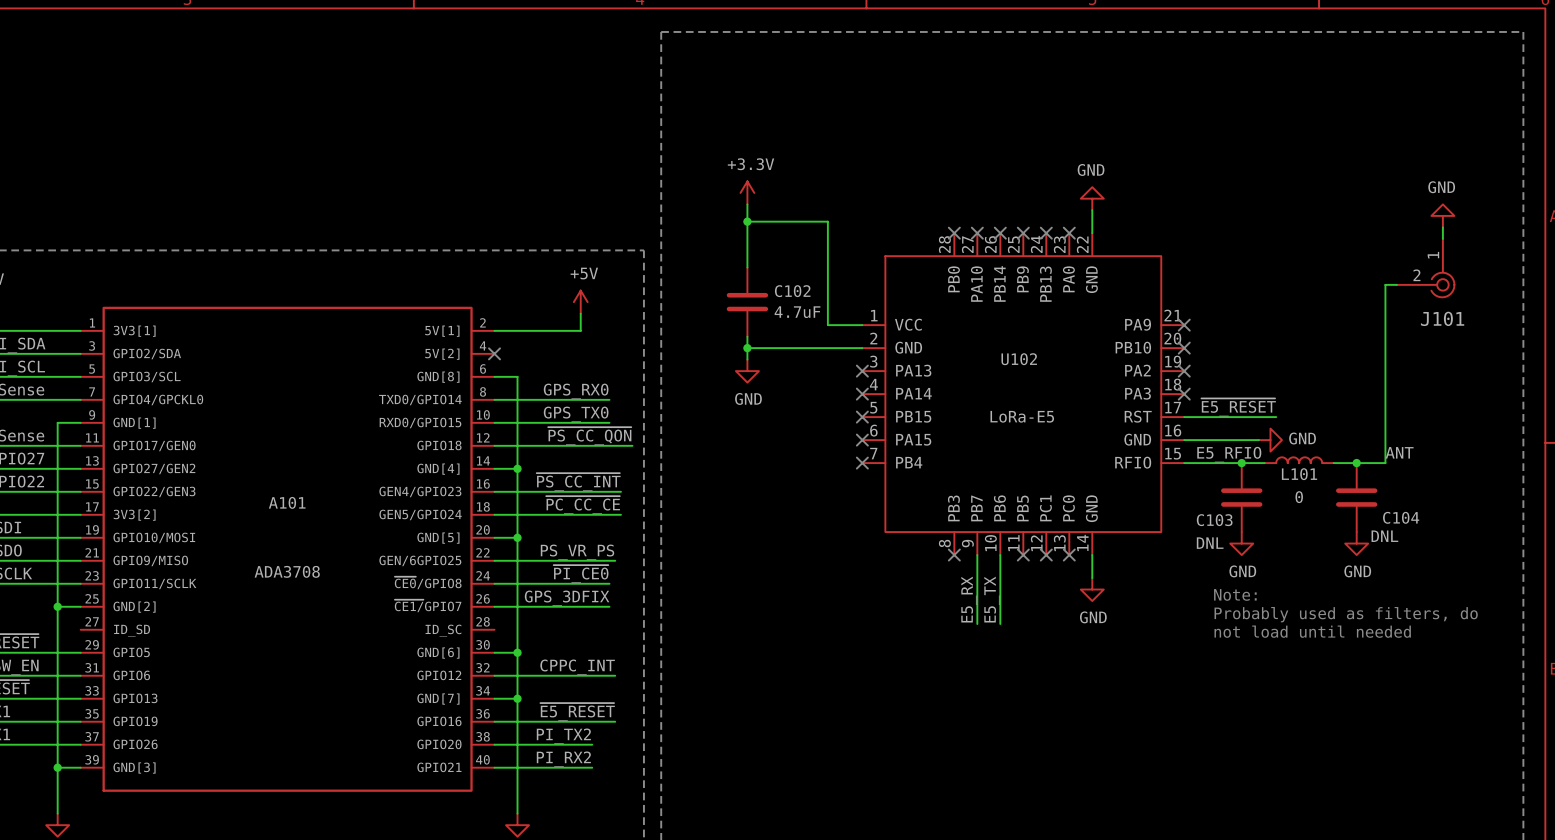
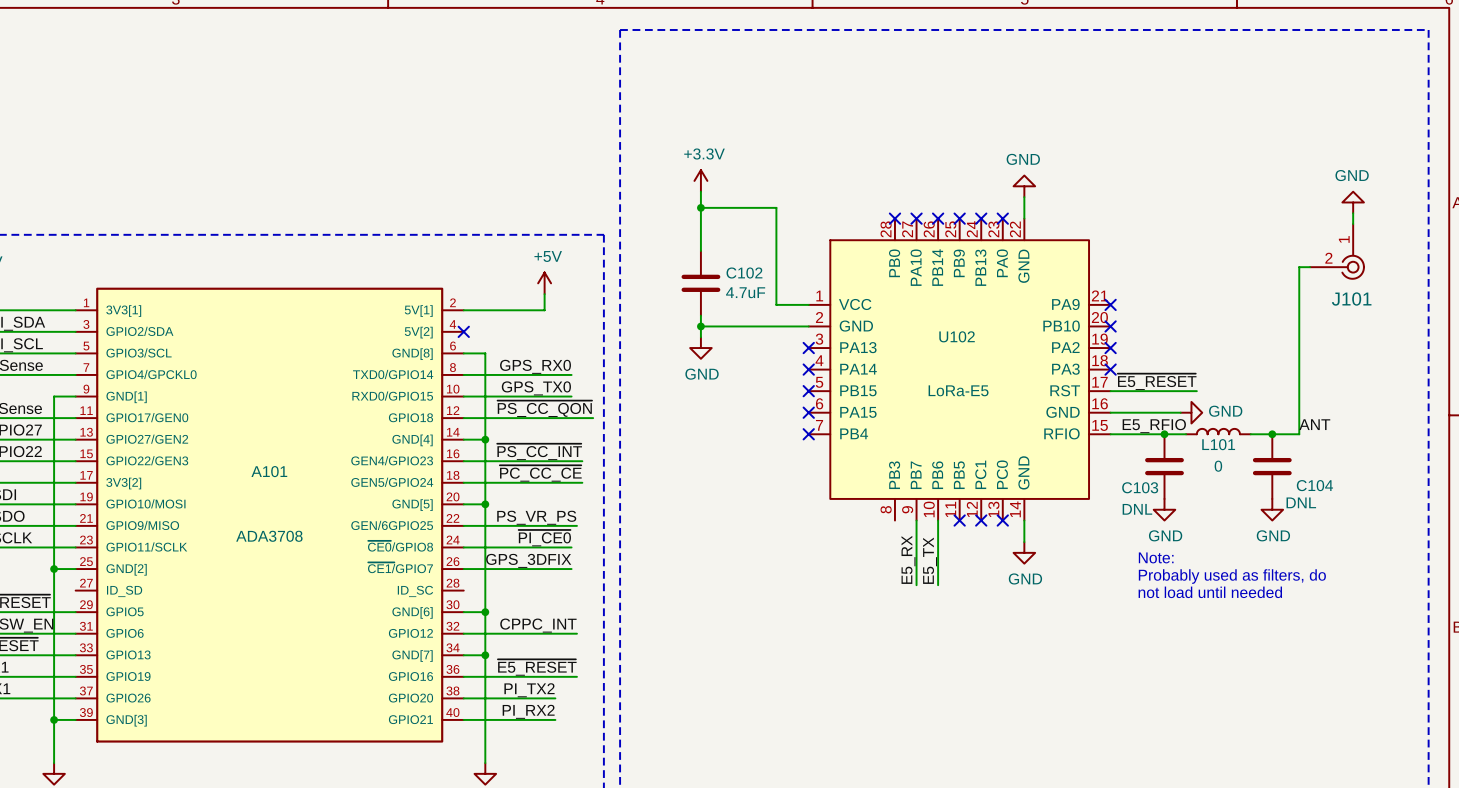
no-connect mark: (954, 555) -> none

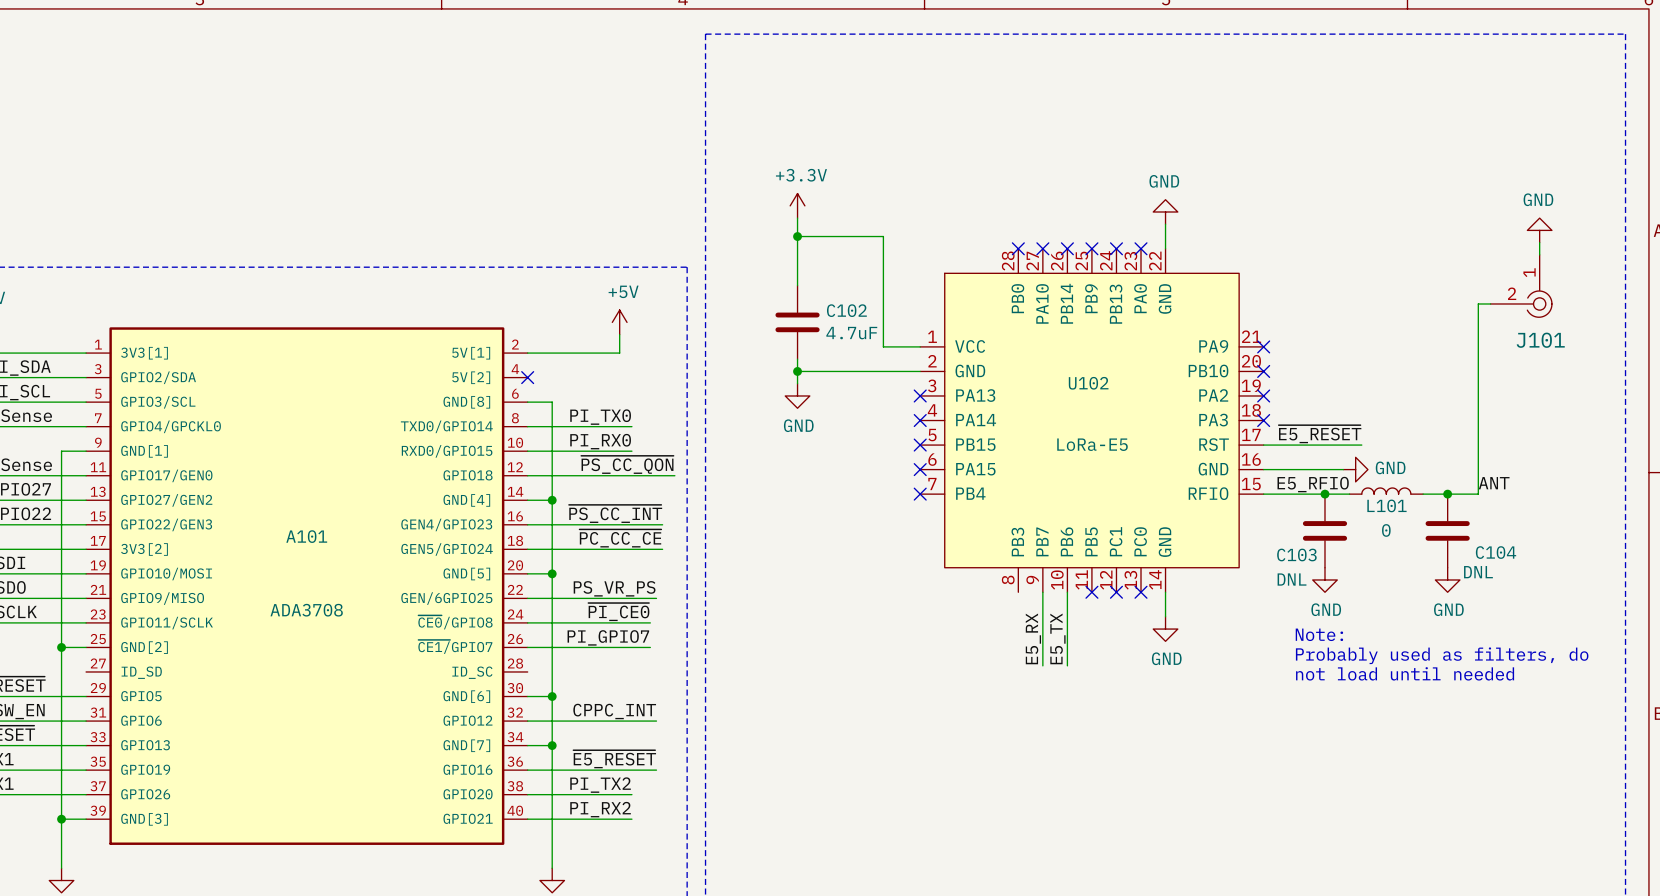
label: none -> PI_TX0 (600, 417)
label: GPS_RX0 (535, 366) -> none
wire: (555, 374) (571, 374) -> none
label: none -> PI_RX0 (600, 441)
label: GPS_TX0 (536, 388) -> none
wire: (555, 396) (571, 396) -> none
label: GPS_3DFIX (528, 560) -> PI_GPIO7 (608, 637)

